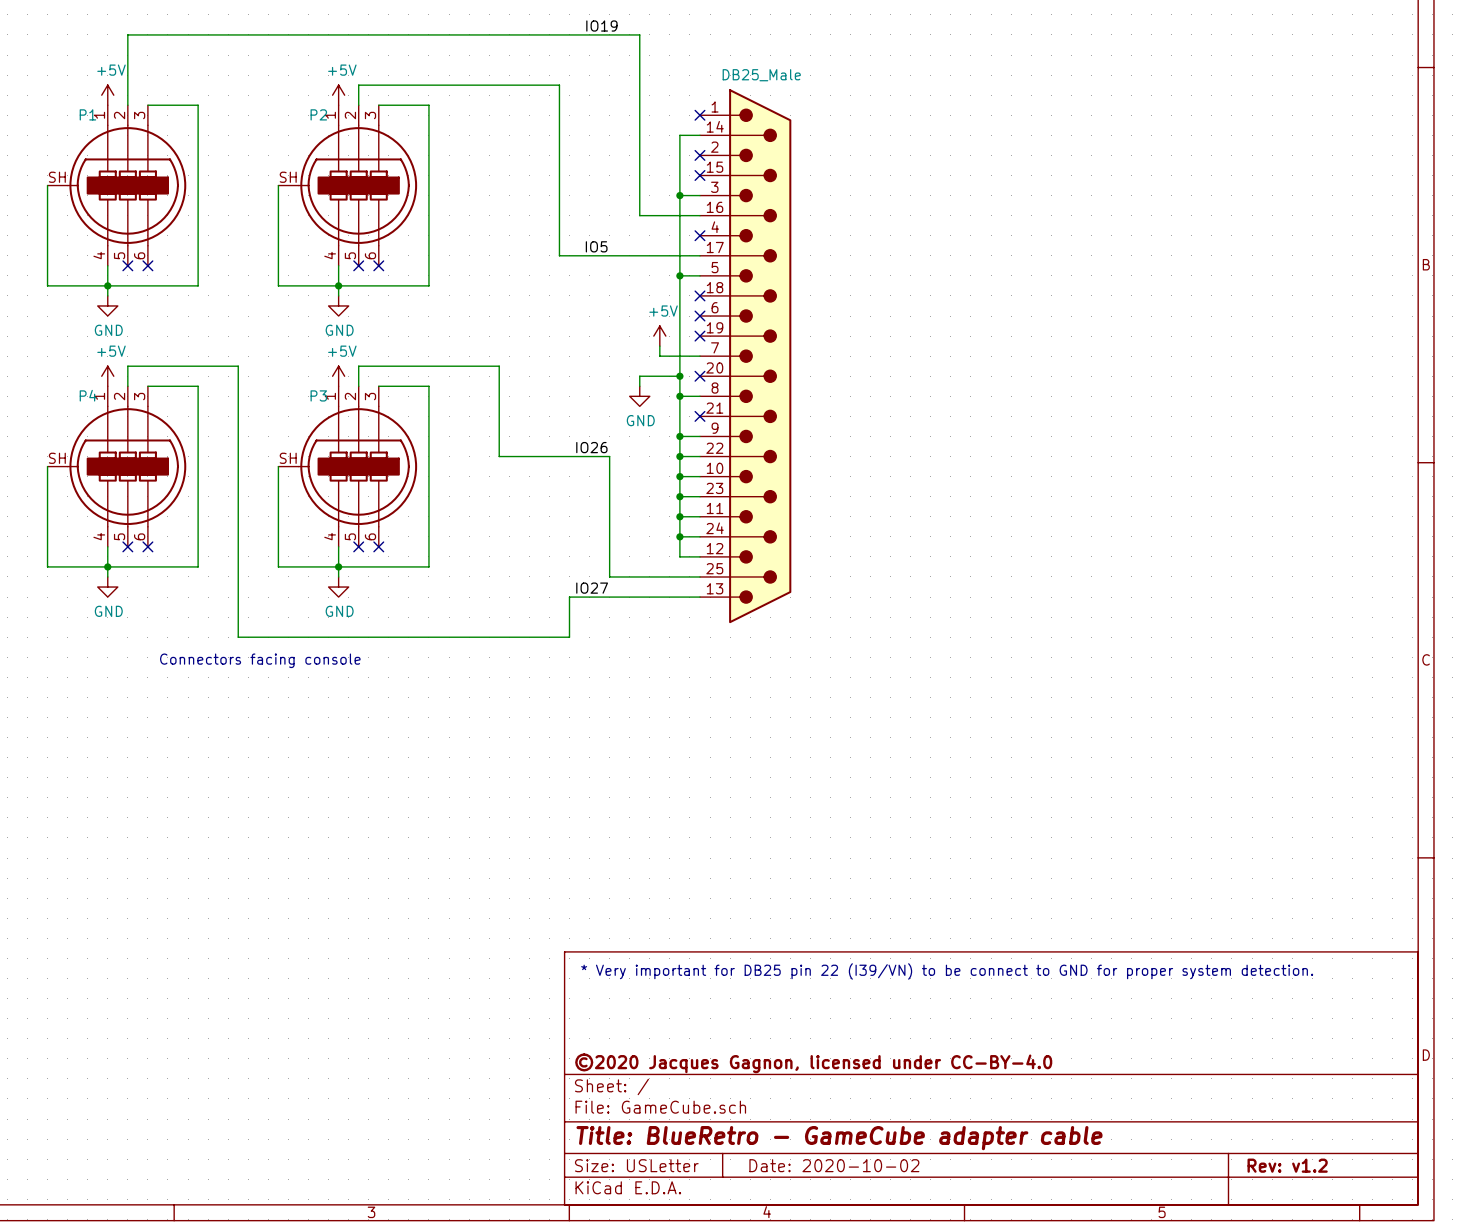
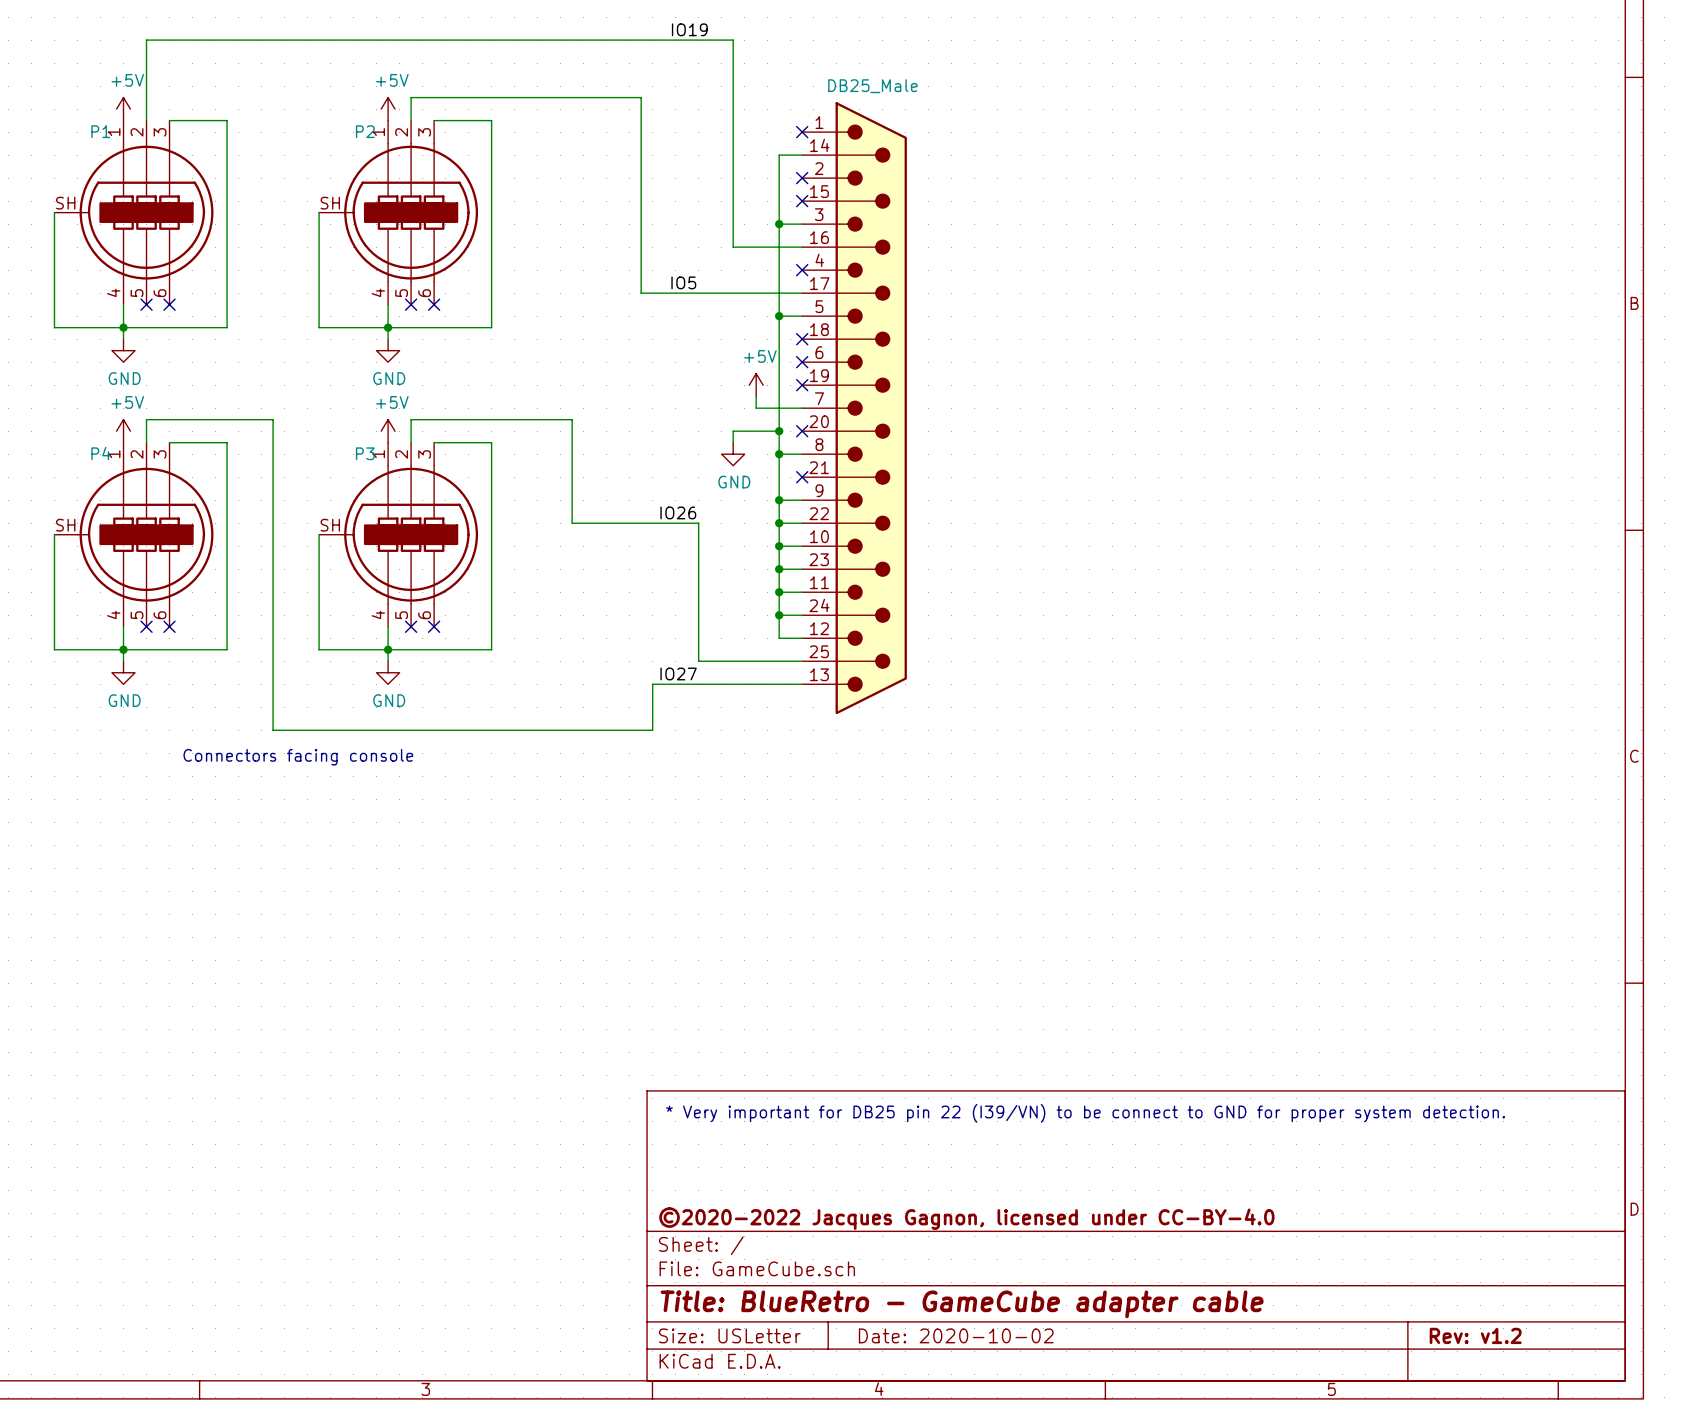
title block: ©2020 Jacques Gagnon, licensed under CC-BY-4.0 (813, 1063) -> ©2020-2022 Jacques Gagnon, licensed under CC-BY-4.0 (966, 1218)

